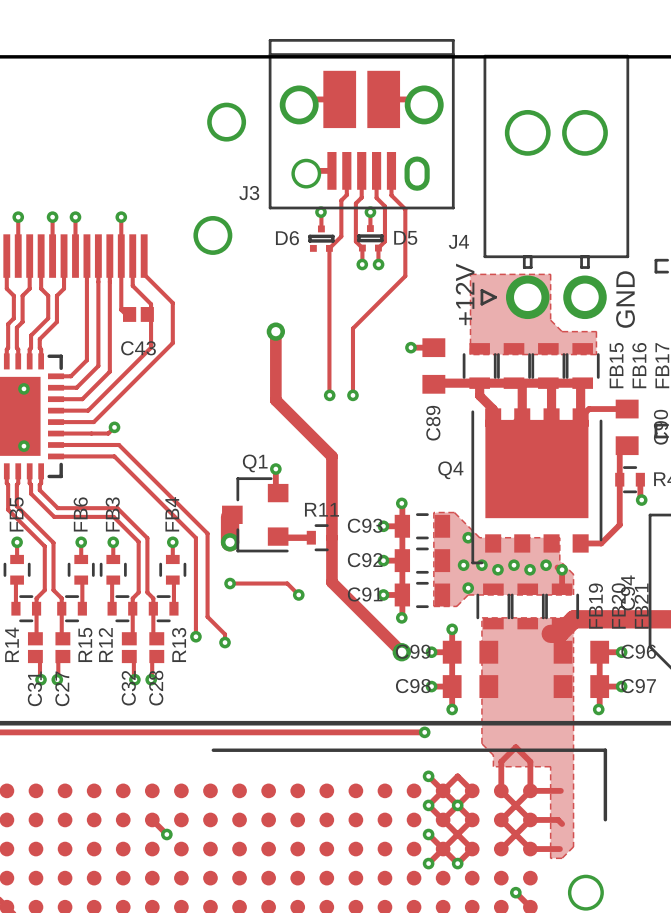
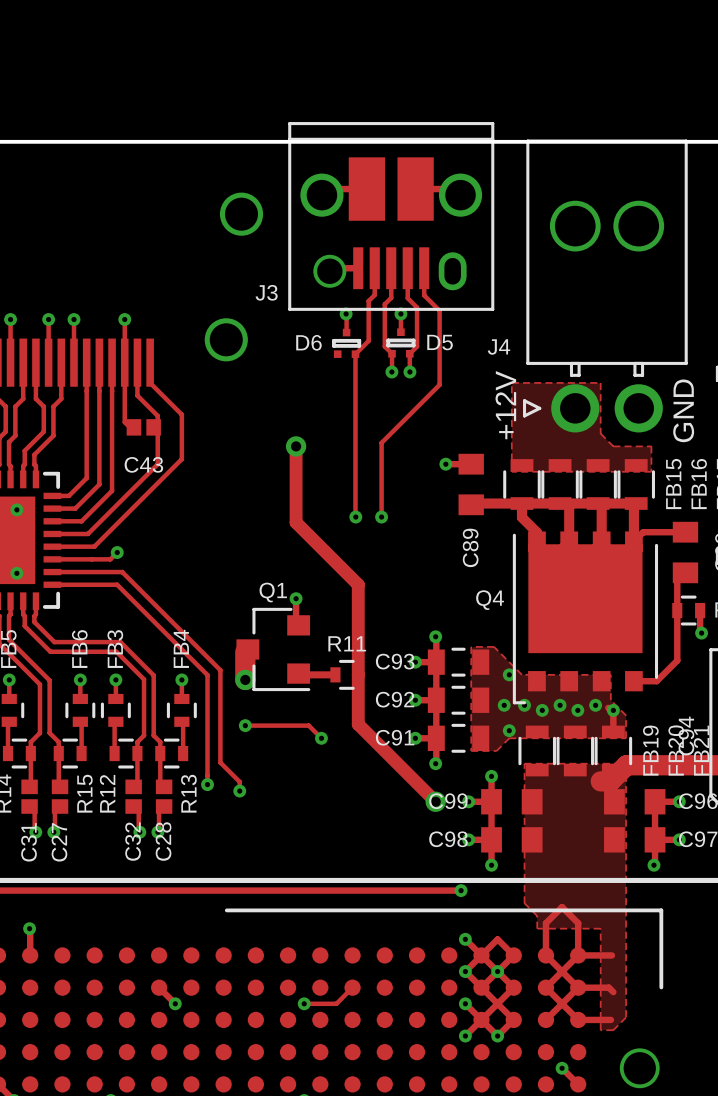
track: none -> (29, 928) (30, 955)
via: none -> (29, 928)
track: none -> (352, 987) (336, 1003) (304, 1003)
via: none -> (304, 1003)

